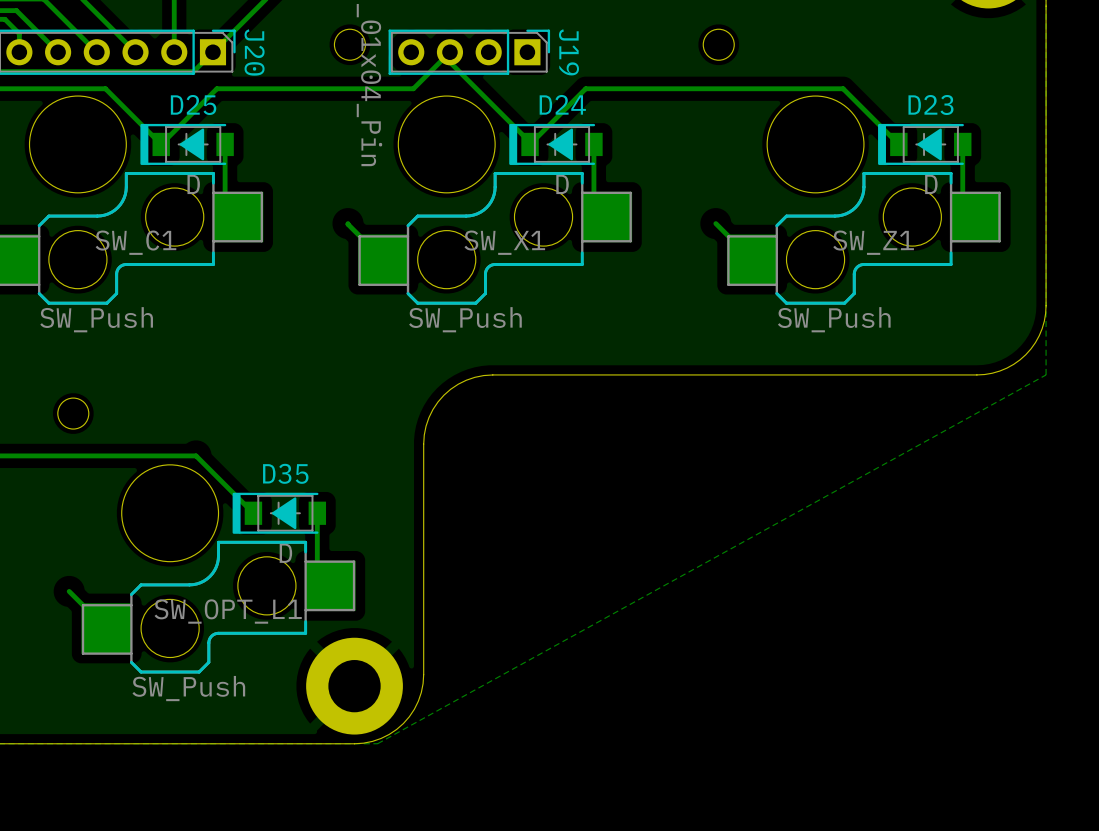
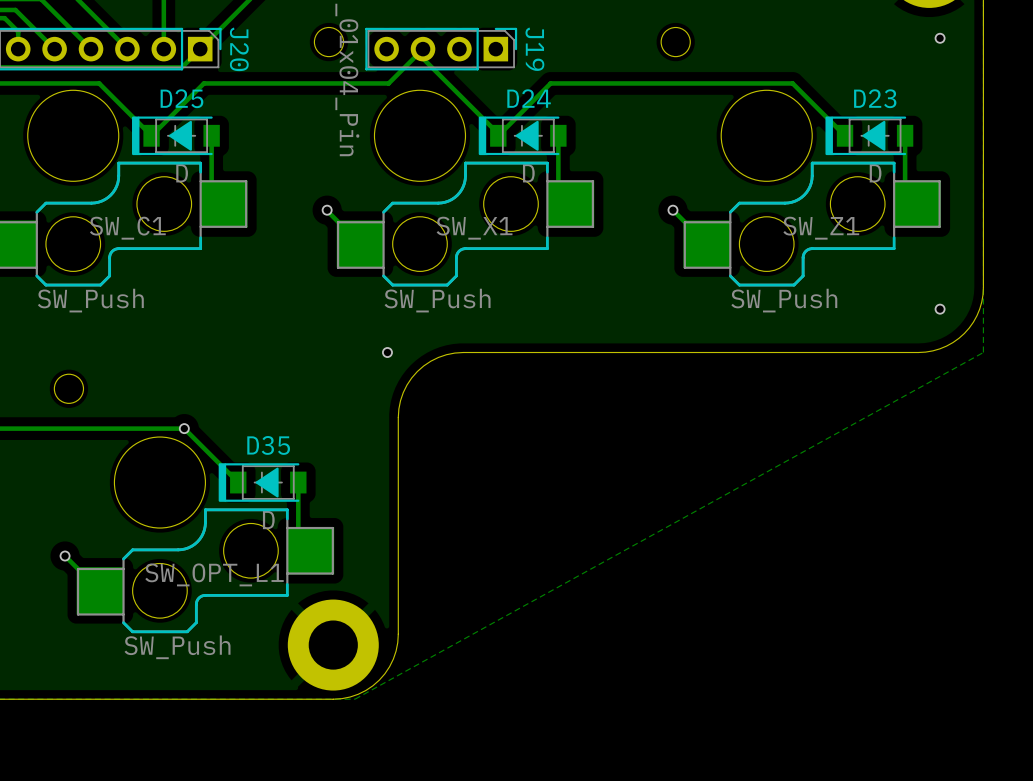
via: none -> (940, 38)
via: none -> (327, 210)
via: none -> (672, 210)
via: none -> (940, 309)
via: none -> (387, 352)
via: none -> (184, 428)
via: none -> (65, 556)

